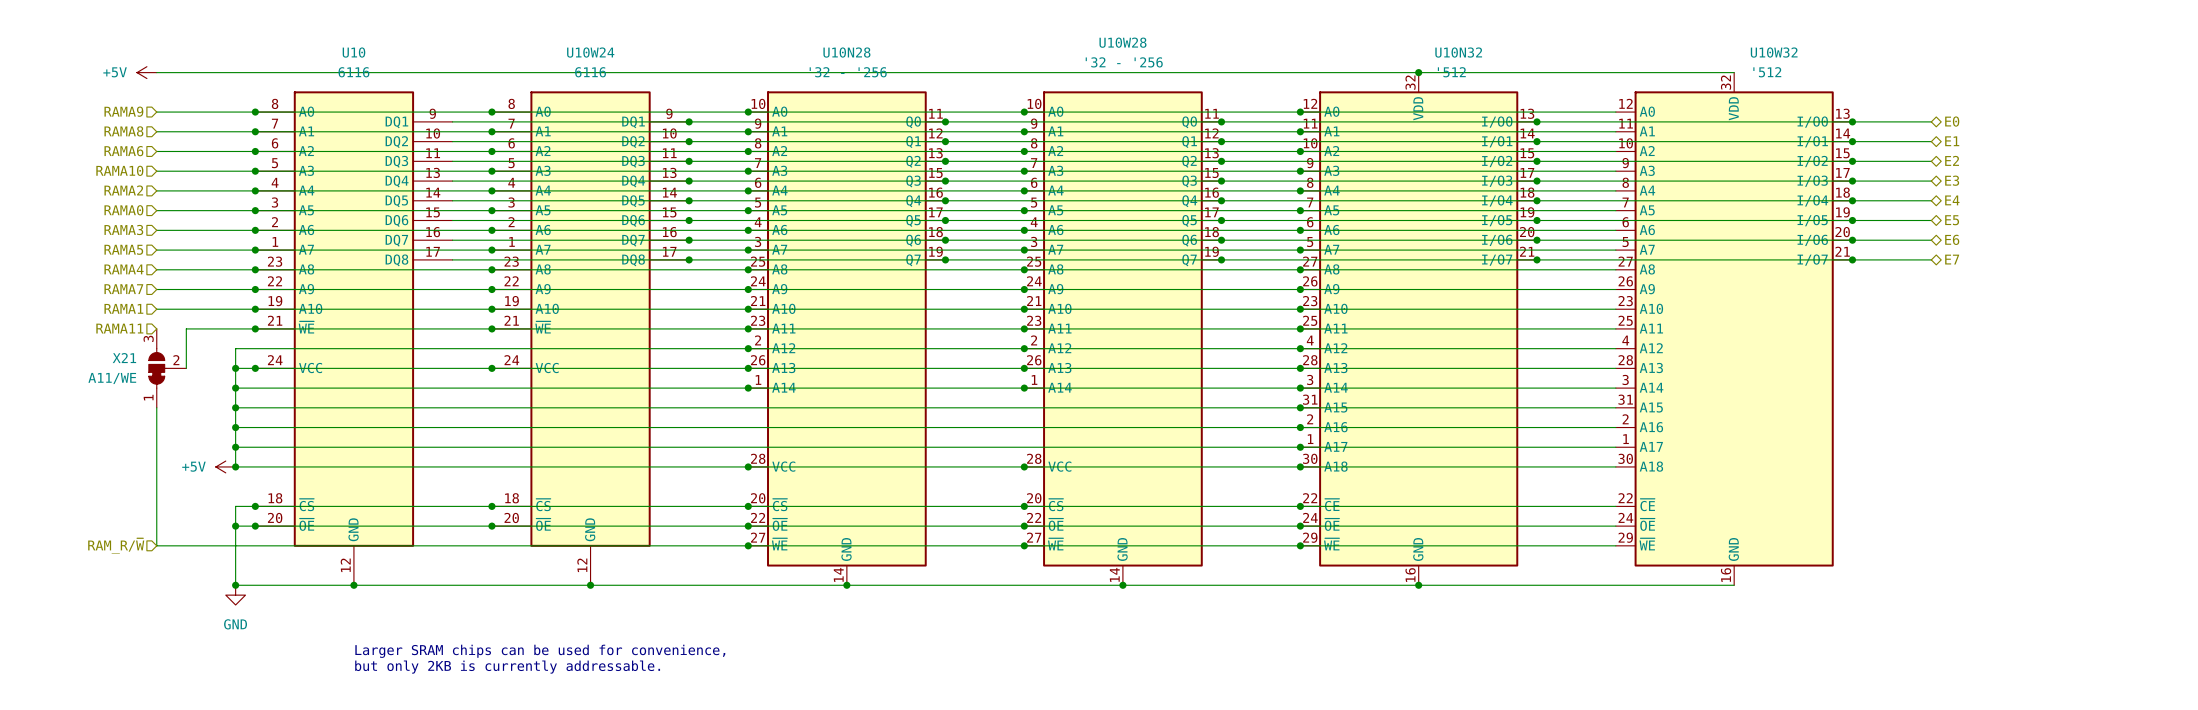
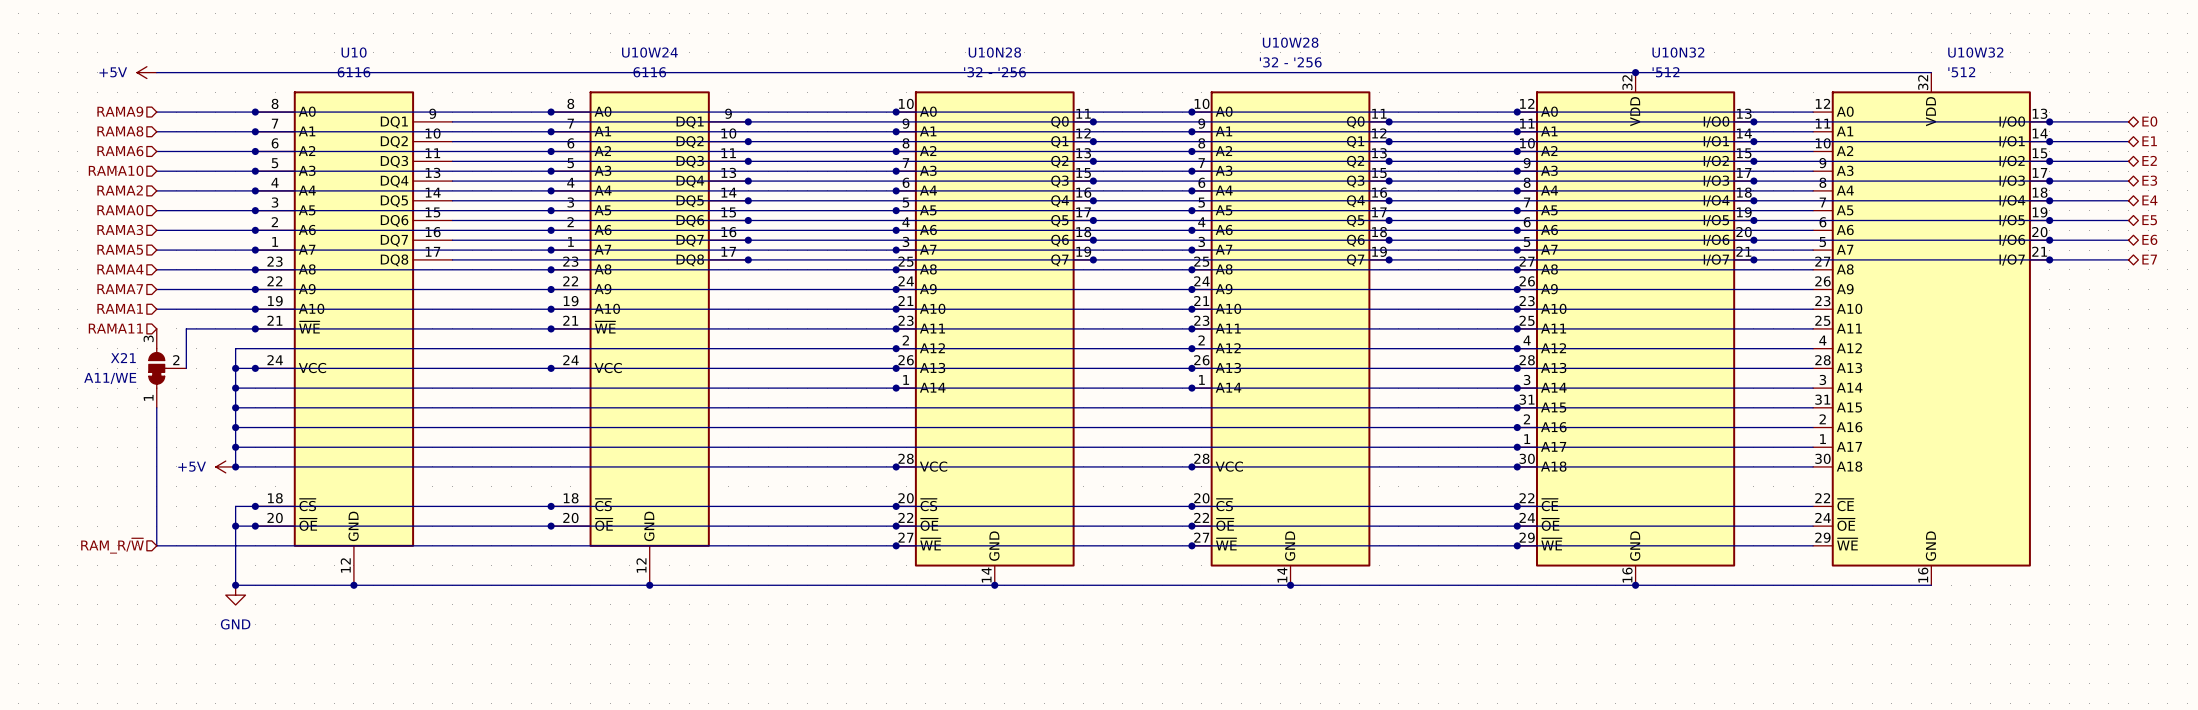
junction: (1418, 72) -> none
junction: none -> (1635, 72)
wire: none -> (1734, 72) (1931, 72)
junction: (491, 112) -> none
junction: none -> (551, 112)
junction: (748, 112) -> none
junction: none -> (896, 112)
junction: (1024, 112) -> none
junction: none -> (1191, 112)
junction: (1300, 112) -> none
junction: none -> (1517, 112)
junction: (689, 121) -> none
junction: none -> (748, 121)
junction: (945, 121) -> none
junction: none -> (1093, 121)
junction: (1221, 121) -> none
junction: none -> (1389, 121)
junction: (1536, 121) -> none
junction: none -> (1753, 121)
junction: (1852, 121) -> none
wire: none -> (1931, 121) (2128, 121)
hierarchical label: E0 (1952, 121) -> none
junction: none -> (2049, 121)
hierarchical label: none -> E0 (2149, 121)
junction: (491, 131) -> none
junction: none -> (551, 131)
junction: (748, 131) -> none
junction: none -> (896, 131)
junction: (1024, 131) -> none
junction: none -> (1191, 131)
junction: (1300, 131) -> none
junction: none -> (1517, 131)
junction: (689, 141) -> none
junction: none -> (748, 141)
junction: (945, 141) -> none
junction: none -> (1093, 141)
junction: (1221, 141) -> none
junction: none -> (1389, 141)
junction: (1536, 141) -> none
junction: none -> (1753, 141)
junction: (1852, 141) -> none
wire: none -> (1931, 141) (2128, 141)
hierarchical label: E1 (1952, 141) -> none
junction: none -> (2049, 141)
hierarchical label: none -> E1 (2149, 141)
junction: (491, 151) -> none
junction: none -> (551, 151)
junction: (748, 151) -> none
junction: none -> (896, 151)
junction: (1024, 151) -> none
junction: none -> (1191, 151)
junction: (1300, 151) -> none
junction: none -> (1517, 151)
hierarchical label: E2 (1952, 160) -> none
hierarchical label: none -> E2 (2149, 160)
junction: (689, 161) -> none
junction: none -> (748, 161)
junction: (945, 161) -> none
junction: none -> (1093, 161)
junction: (1221, 161) -> none
junction: none -> (1389, 161)
junction: (1536, 161) -> none
junction: none -> (1753, 161)
junction: (1852, 161) -> none
wire: none -> (1931, 161) (2128, 161)
junction: none -> (2049, 161)
junction: (491, 171) -> none
junction: none -> (551, 171)
junction: (748, 171) -> none
junction: none -> (896, 171)
junction: (1024, 171) -> none
junction: none -> (1191, 171)
junction: (1300, 171) -> none
junction: none -> (1517, 171)
hierarchical label: E3 (1952, 180) -> none
hierarchical label: none -> E3 (2149, 180)
junction: (689, 181) -> none
junction: none -> (748, 181)
junction: (945, 181) -> none
junction: none -> (1093, 181)
junction: (1221, 181) -> none
junction: none -> (1389, 181)
junction: (1536, 181) -> none
junction: none -> (1753, 181)
junction: (1852, 181) -> none
wire: none -> (1931, 181) (2128, 181)
junction: none -> (2049, 181)
junction: (491, 190) -> none
junction: none -> (551, 190)
junction: (748, 190) -> none
junction: none -> (896, 190)
junction: (1024, 190) -> none
junction: none -> (1191, 190)
junction: (1300, 190) -> none
junction: none -> (1517, 190)
junction: (689, 200) -> none
junction: none -> (748, 200)
junction: (945, 200) -> none
junction: none -> (1093, 200)
junction: (1221, 200) -> none
junction: none -> (1389, 200)
junction: (1536, 200) -> none
junction: none -> (1753, 200)
junction: (1852, 200) -> none
wire: none -> (1931, 200) (2128, 200)
hierarchical label: E4 (1952, 200) -> none
junction: none -> (2049, 200)
hierarchical label: none -> E4 (2149, 200)
junction: (491, 210) -> none
junction: none -> (551, 210)
junction: (748, 210) -> none
junction: none -> (896, 210)
junction: (1024, 210) -> none
junction: none -> (1191, 210)
junction: (1300, 210) -> none
junction: none -> (1517, 210)
junction: (689, 220) -> none
junction: none -> (748, 220)
junction: (945, 220) -> none
junction: none -> (1093, 220)
junction: (1221, 220) -> none
junction: none -> (1389, 220)
junction: (1536, 220) -> none
junction: none -> (1753, 220)
junction: (1852, 220) -> none
wire: none -> (1931, 220) (2128, 220)
hierarchical label: E5 (1952, 220) -> none
junction: none -> (2049, 220)
hierarchical label: none -> E5 (2149, 220)
junction: (491, 230) -> none
junction: none -> (551, 230)
junction: (748, 230) -> none
junction: none -> (896, 230)
junction: (1024, 230) -> none
junction: none -> (1191, 230)
junction: (1300, 230) -> none
junction: none -> (1517, 230)
hierarchical label: E6 (1952, 239) -> none
hierarchical label: none -> E6 (2149, 239)
junction: (689, 240) -> none
junction: none -> (748, 240)
junction: (945, 240) -> none
junction: none -> (1093, 240)
junction: (1221, 240) -> none
junction: none -> (1389, 240)
junction: (1536, 240) -> none
junction: none -> (1753, 240)
junction: (1852, 240) -> none
wire: none -> (1931, 240) (2128, 240)
junction: none -> (2049, 240)
junction: (491, 250) -> none
junction: none -> (551, 250)
junction: (748, 250) -> none
junction: none -> (896, 250)
junction: (1024, 250) -> none
junction: none -> (1191, 250)
junction: (1300, 250) -> none
junction: none -> (1517, 250)
junction: (689, 259) -> none
junction: none -> (748, 259)
junction: (945, 259) -> none
junction: none -> (1093, 259)
junction: (1221, 259) -> none
junction: none -> (1389, 259)
junction: (1536, 259) -> none
junction: none -> (1753, 259)
junction: (1852, 259) -> none
wire: none -> (1931, 259) (2128, 259)
hierarchical label: E7 (1952, 259) -> none
junction: none -> (2049, 259)
hierarchical label: none -> E7 (2149, 259)
junction: (491, 269) -> none
junction: none -> (551, 269)
junction: (748, 269) -> none
junction: none -> (896, 269)
junction: (1024, 269) -> none
junction: none -> (1191, 269)
junction: (1300, 269) -> none
junction: none -> (1517, 269)
junction: (491, 289) -> none
junction: none -> (551, 289)
junction: (748, 289) -> none
junction: none -> (896, 289)
junction: (1024, 289) -> none
junction: none -> (1191, 289)
junction: (1300, 289) -> none
junction: none -> (1517, 289)
junction: (491, 309) -> none
junction: none -> (551, 309)
junction: (748, 309) -> none
junction: none -> (896, 309)
junction: (1024, 309) -> none
junction: none -> (1191, 309)
junction: (1300, 309) -> none
junction: none -> (1517, 309)
junction: (491, 328) -> none
junction: none -> (551, 328)
junction: (748, 328) -> none
junction: none -> (896, 328)
junction: (1024, 328) -> none
junction: none -> (1191, 328)
junction: (1300, 328) -> none
U10N32 position: (1418, 328) -> (1635, 328)
junction: none -> (1517, 328)
U10W32 position: (1734, 328) -> (1931, 328)
U10W24 position: (590, 338) -> (649, 338)
U10N28 position: (846, 338) -> (994, 338)
U10W28 position: (1122, 338) -> (1290, 338)
junction: (748, 348) -> none
junction: none -> (896, 348)
junction: (1024, 348) -> none
junction: none -> (1191, 348)
junction: (1300, 348) -> none
junction: none -> (1517, 348)
junction: (491, 368) -> none
junction: none -> (551, 368)
junction: (748, 368) -> none
junction: none -> (896, 368)
junction: (1024, 368) -> none
junction: none -> (1191, 368)
junction: (1300, 368) -> none
junction: none -> (1517, 368)
junction: (748, 388) -> none
junction: none -> (896, 388)
junction: (1024, 388) -> none
junction: none -> (1191, 388)
junction: (1300, 388) -> none
junction: none -> (1517, 388)
junction: (1300, 407) -> none
junction: none -> (1517, 407)
junction: (1300, 427) -> none
junction: none -> (1517, 427)
junction: (1300, 447) -> none
junction: none -> (1517, 447)
junction: (748, 466) -> none
junction: none -> (896, 466)
junction: (1024, 466) -> none
junction: none -> (1191, 466)
junction: (1300, 466) -> none
junction: none -> (1517, 466)
junction: (491, 506) -> none
junction: none -> (551, 506)
junction: (748, 506) -> none
junction: none -> (896, 506)
junction: (1024, 506) -> none
junction: none -> (1191, 506)
junction: (1300, 506) -> none
junction: none -> (1517, 506)
junction: (491, 526) -> none
junction: none -> (551, 526)
junction: (748, 526) -> none
junction: none -> (896, 526)
junction: (1024, 526) -> none
junction: none -> (1191, 526)
junction: (1300, 526) -> none
junction: none -> (1517, 526)
junction: (748, 545) -> none
junction: none -> (896, 545)
junction: (1024, 545) -> none
junction: none -> (1191, 545)
junction: (1300, 545) -> none
junction: none -> (1517, 545)
junction: (590, 585) -> none
junction: none -> (649, 585)
junction: (846, 585) -> none
junction: none -> (994, 585)
junction: (1122, 585) -> none
junction: none -> (1290, 585)
junction: (1418, 585) -> none
junction: none -> (1635, 585)
wire: none -> (1734, 585) (1931, 585)
text: Larger SRAM chips can be used for convenience, (540, 651) -> none
text: but only 2KB is currently addressable. (507, 667) -> none

